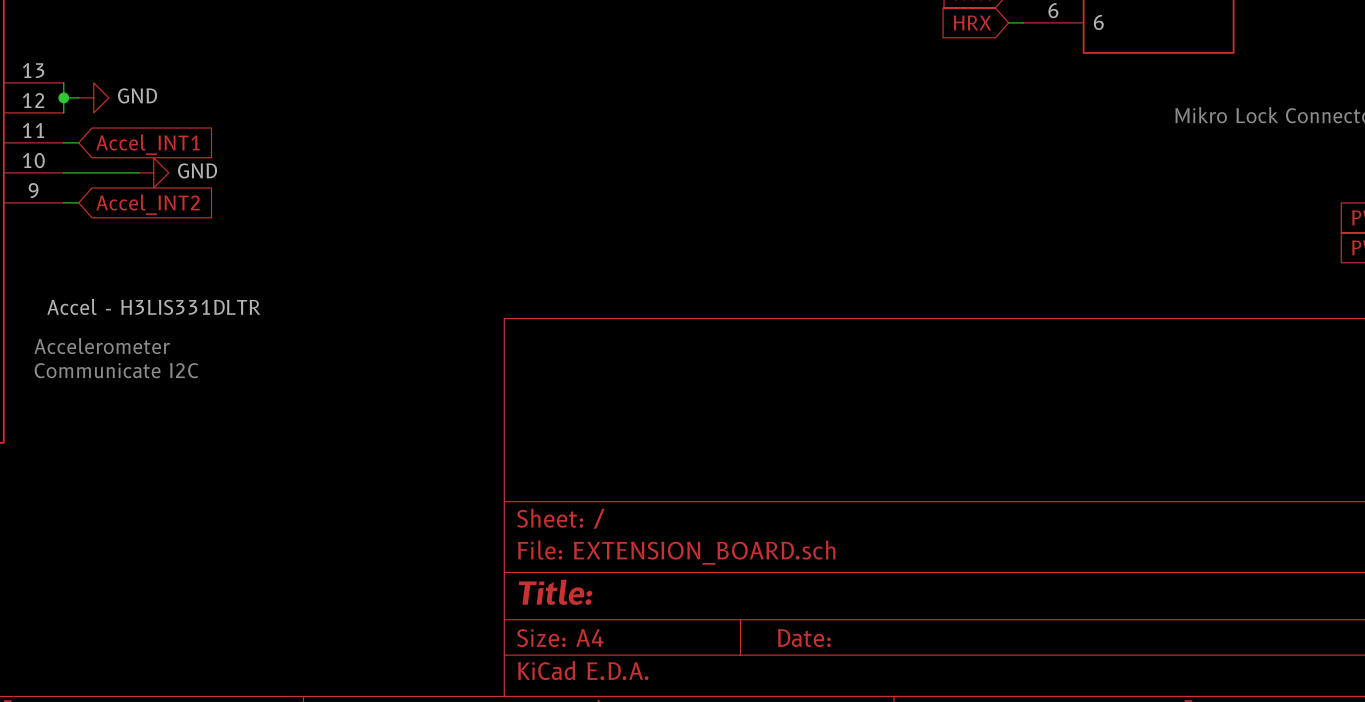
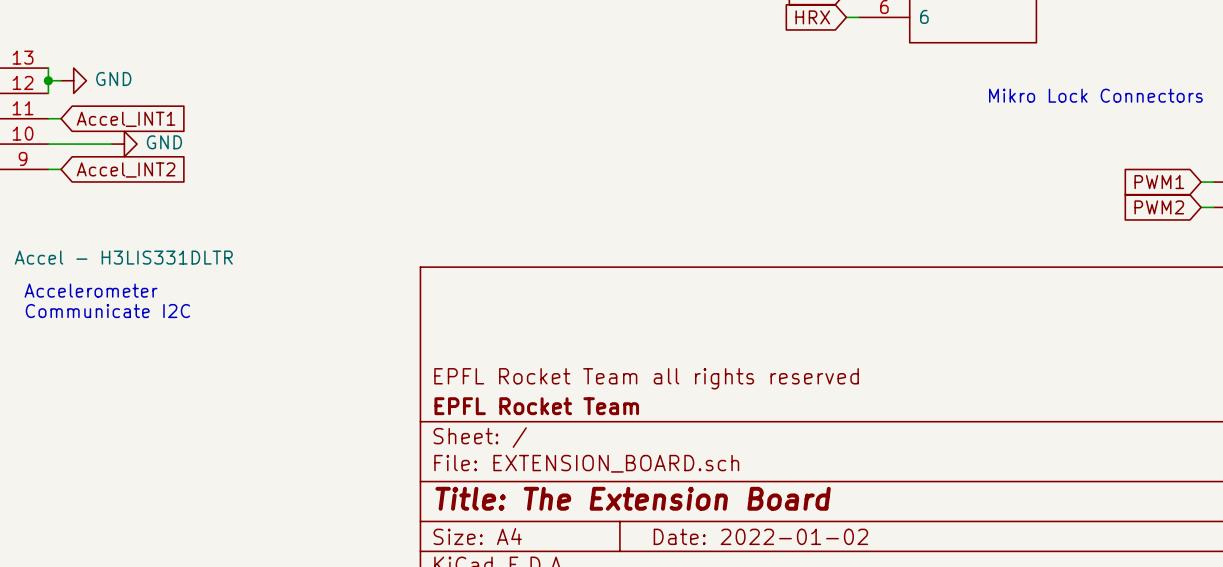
title block: none -> EPFL Rocket Team all rights reserved (646, 378)
title block: none -> EPFL Rocket Team (536, 406)
title block: Title: (555, 592) -> Title: The Extension Board (633, 498)
title block: Date: (804, 638) -> Date: 2022-01-02 (760, 536)

